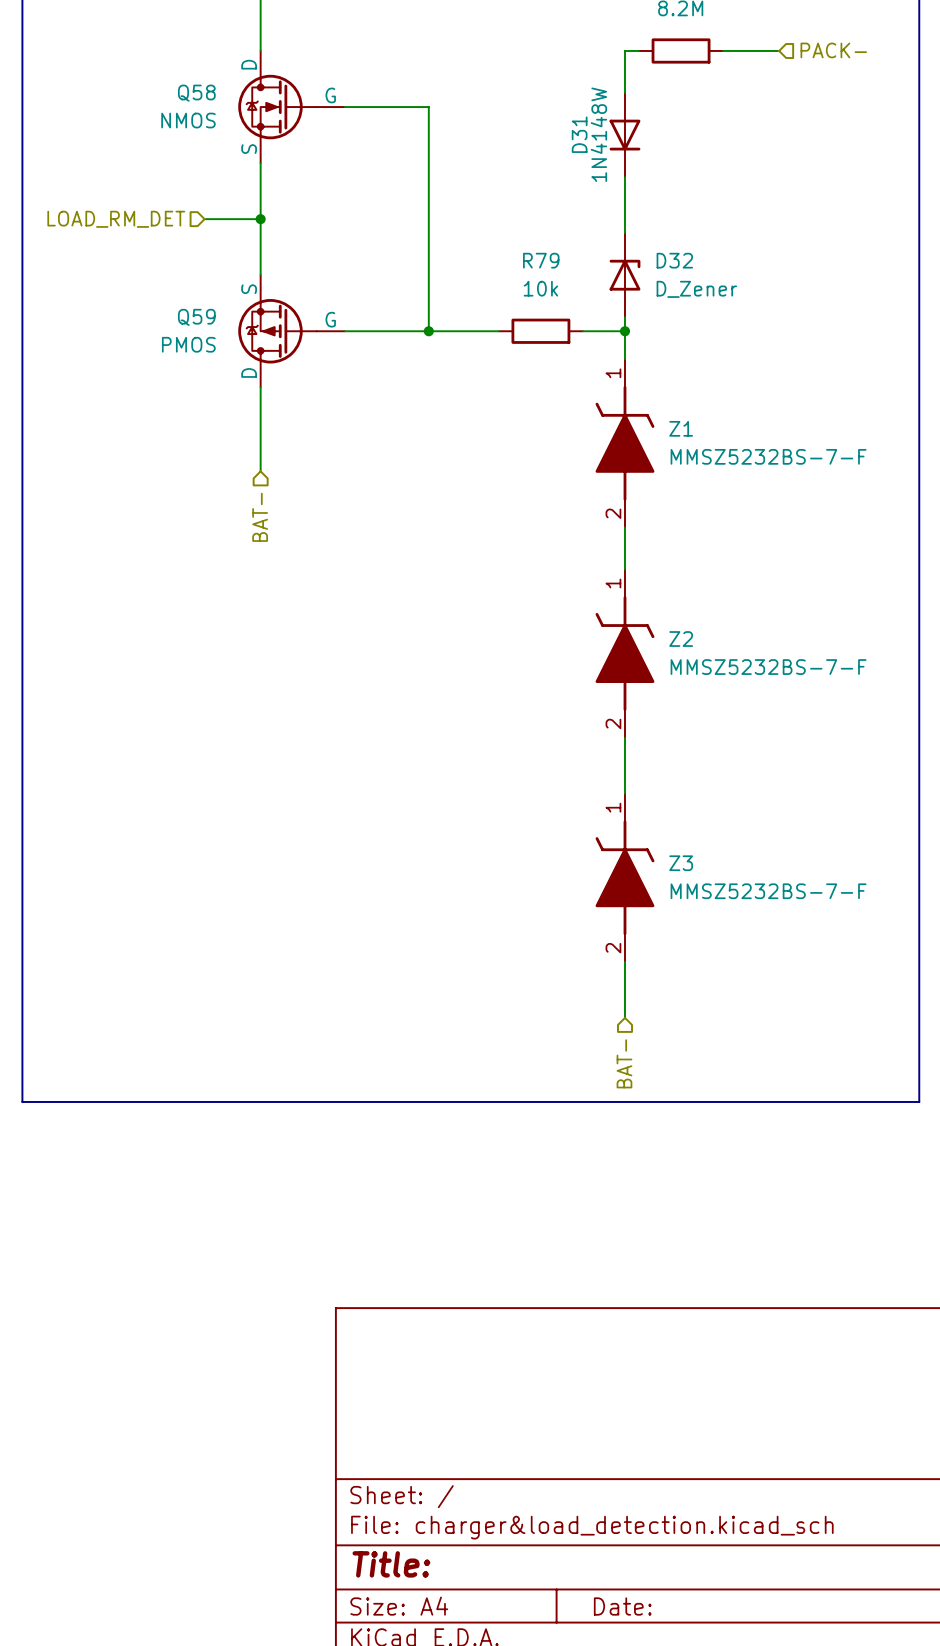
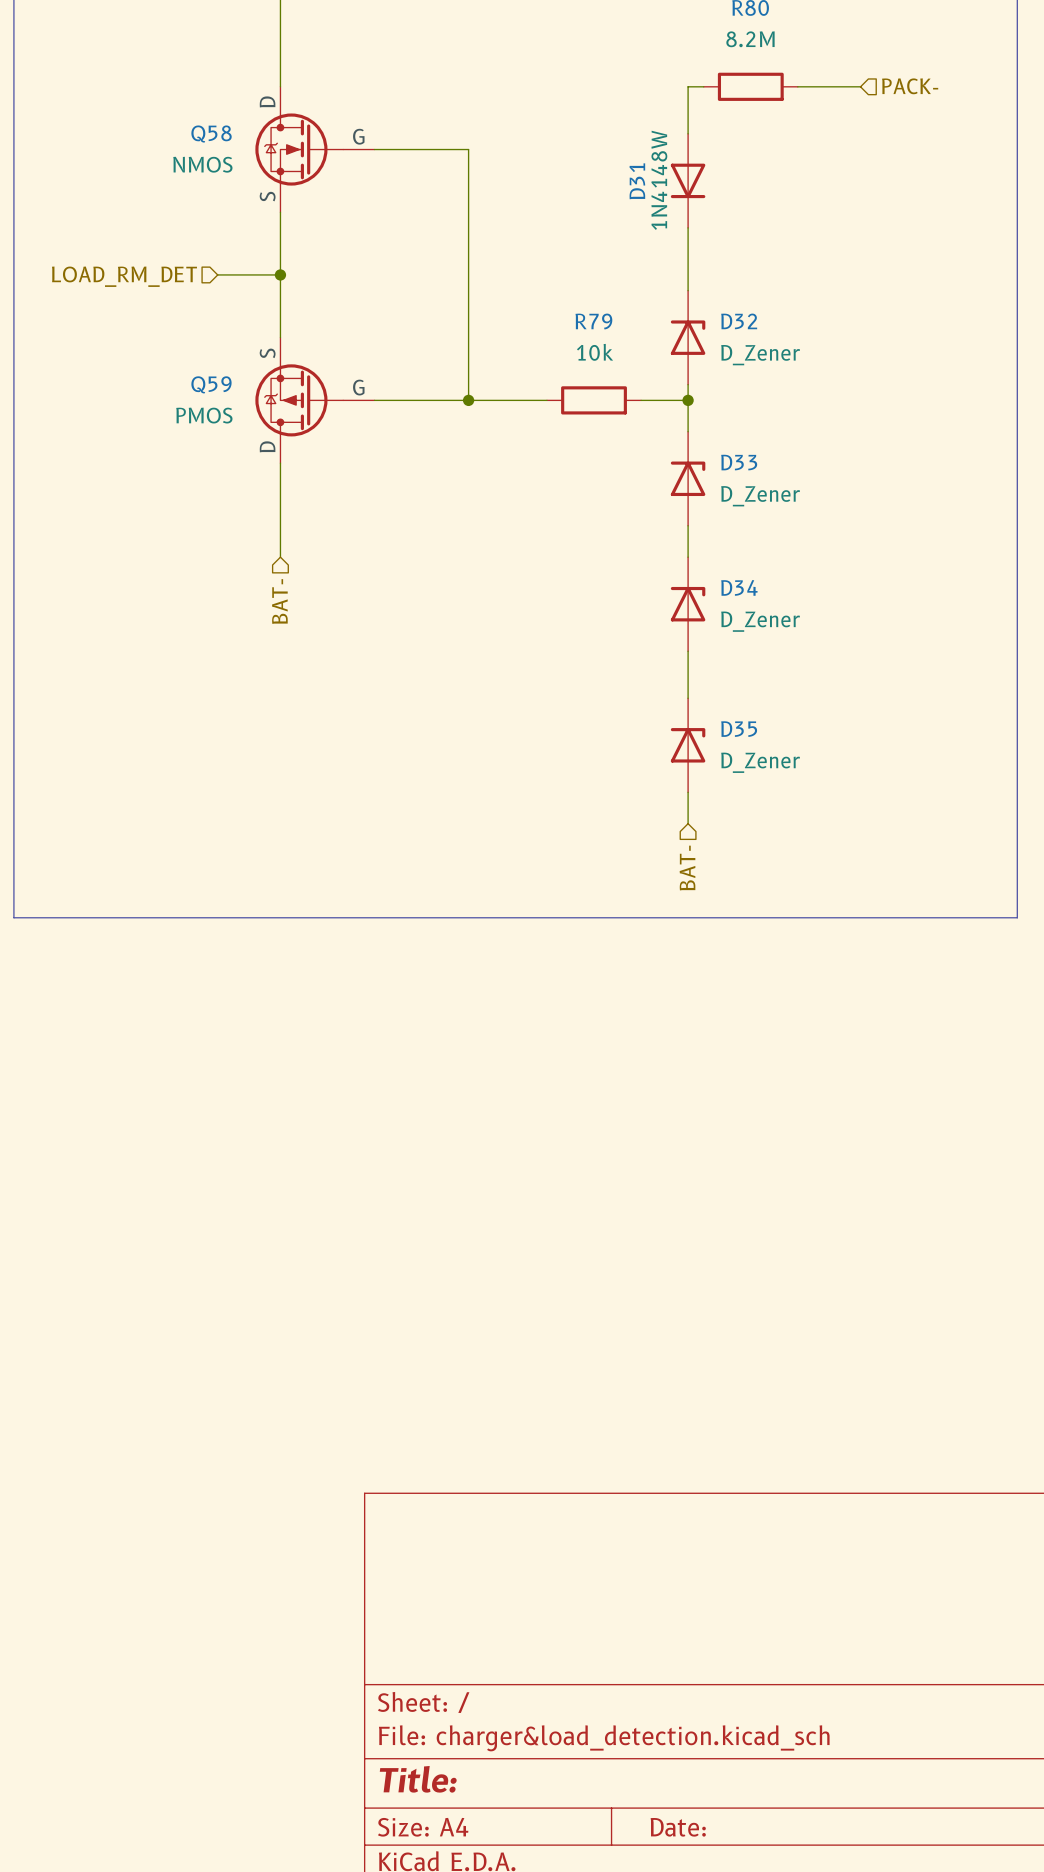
D33: none -> D_Zener (688, 478)
Z1: MMSZ5232BS-7-F (624, 443) -> none
D34: none -> D_Zener (688, 604)
D35: none -> D_Zener (688, 745)
Z2: MMSZ5232BS-7-F (624, 653) -> none
wire: (624, 737) (624, 793) -> none
hierarchical label: none -> BAT- (687, 868)
line: (22, 793) (22, 1101) (919, 1101) (919, 793) -> (13, 917) (1017, 917)
Z3: MMSZ5232BS-7-F (624, 877) -> none
wire: (624, 961) (624, 1017) -> none
hierarchical label: BAT- (624, 1063) -> none

